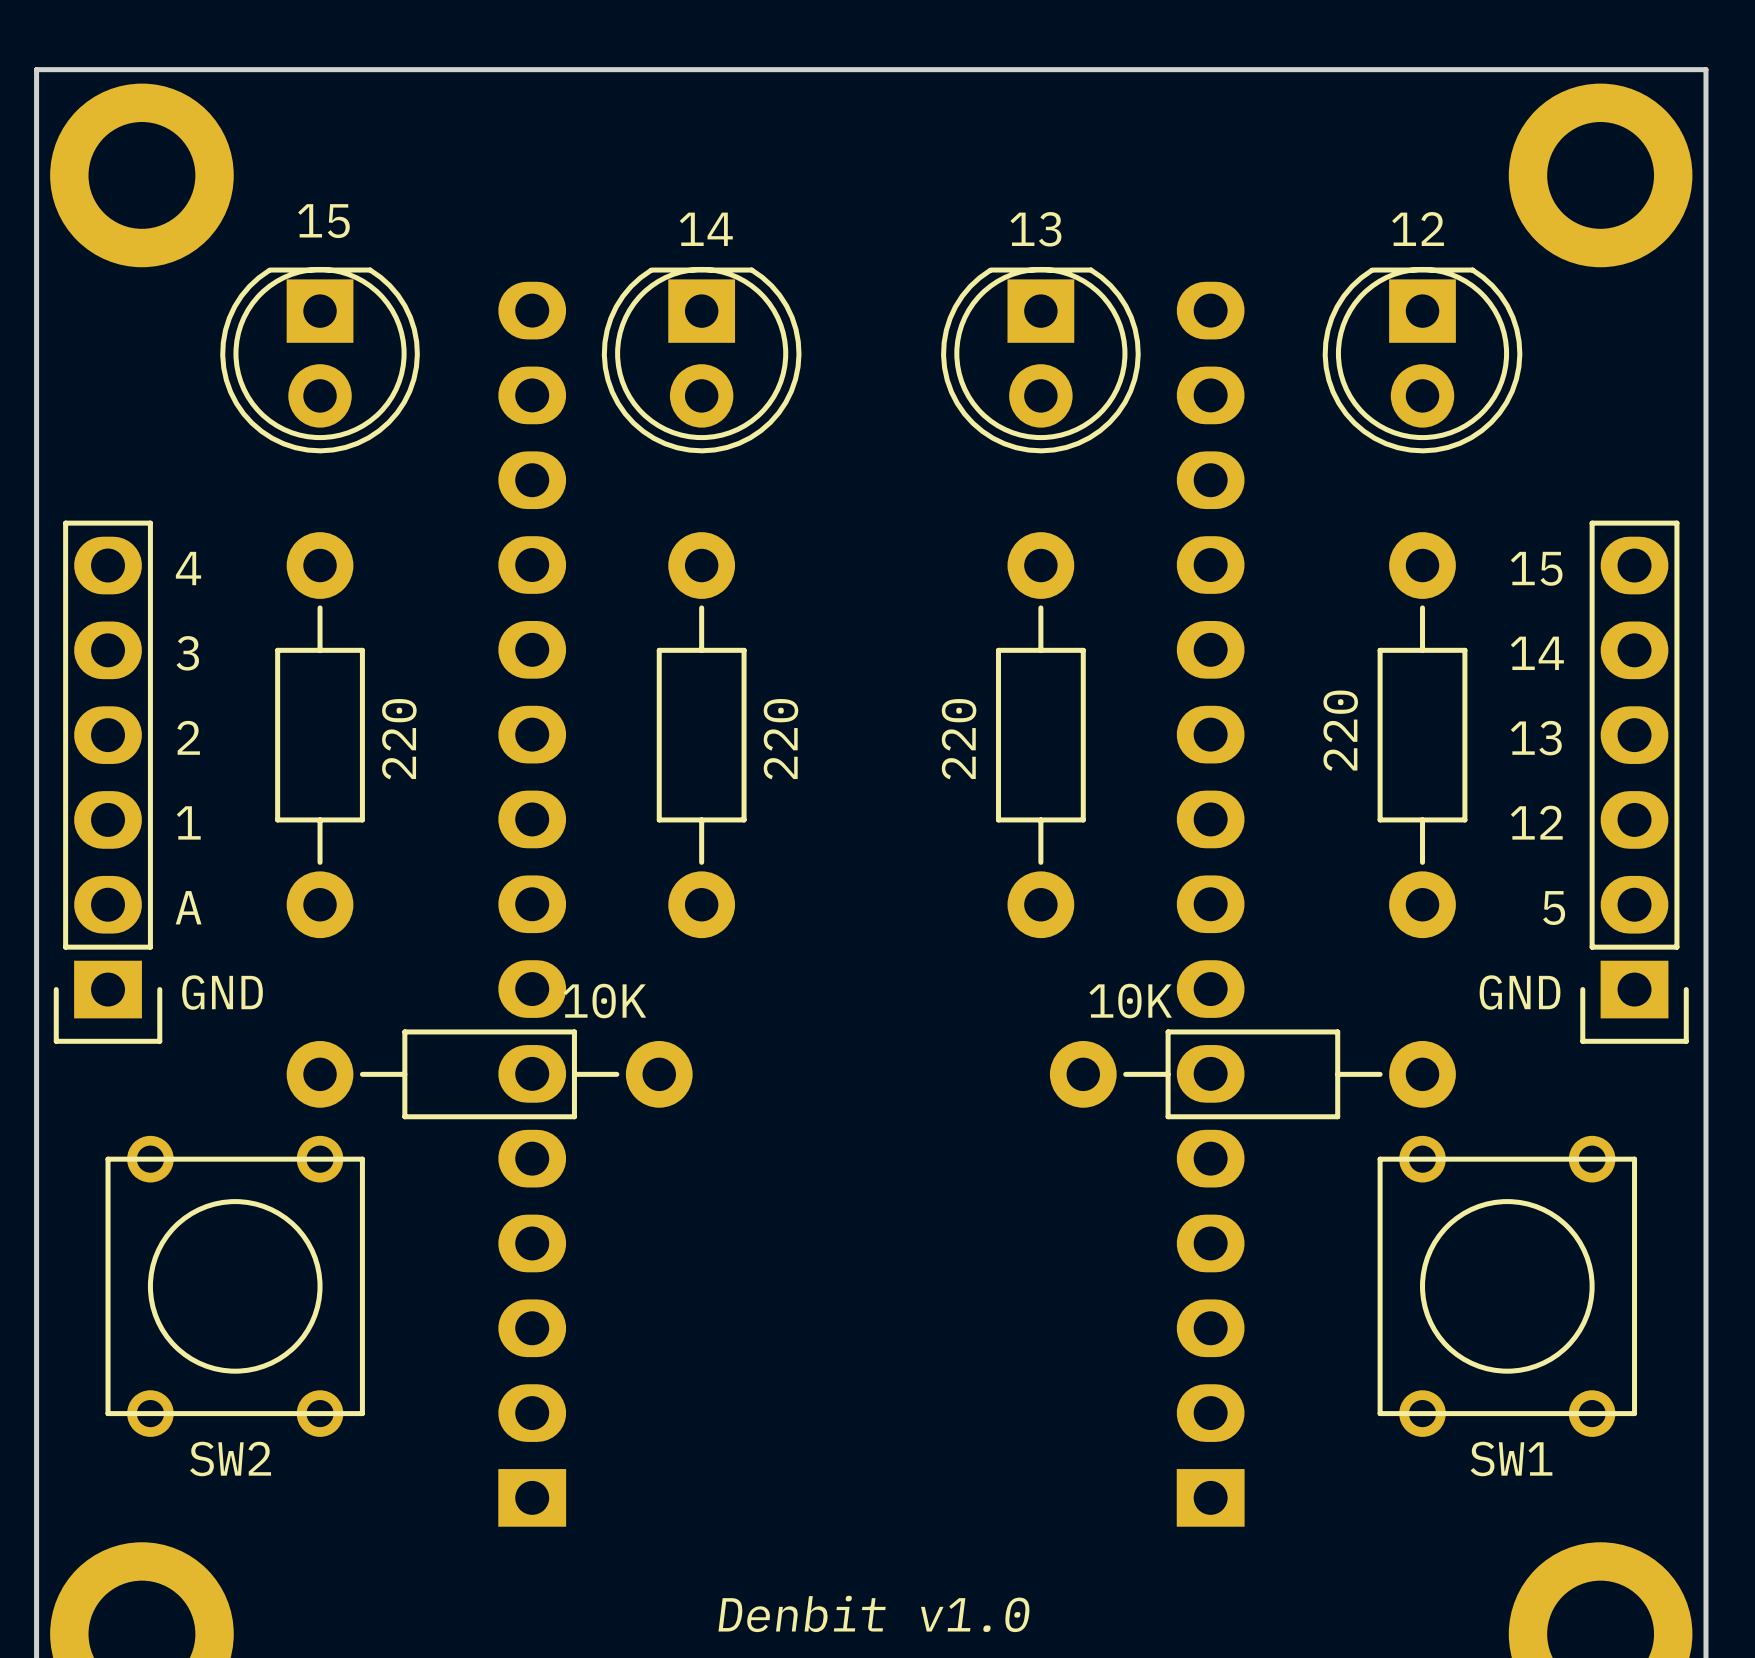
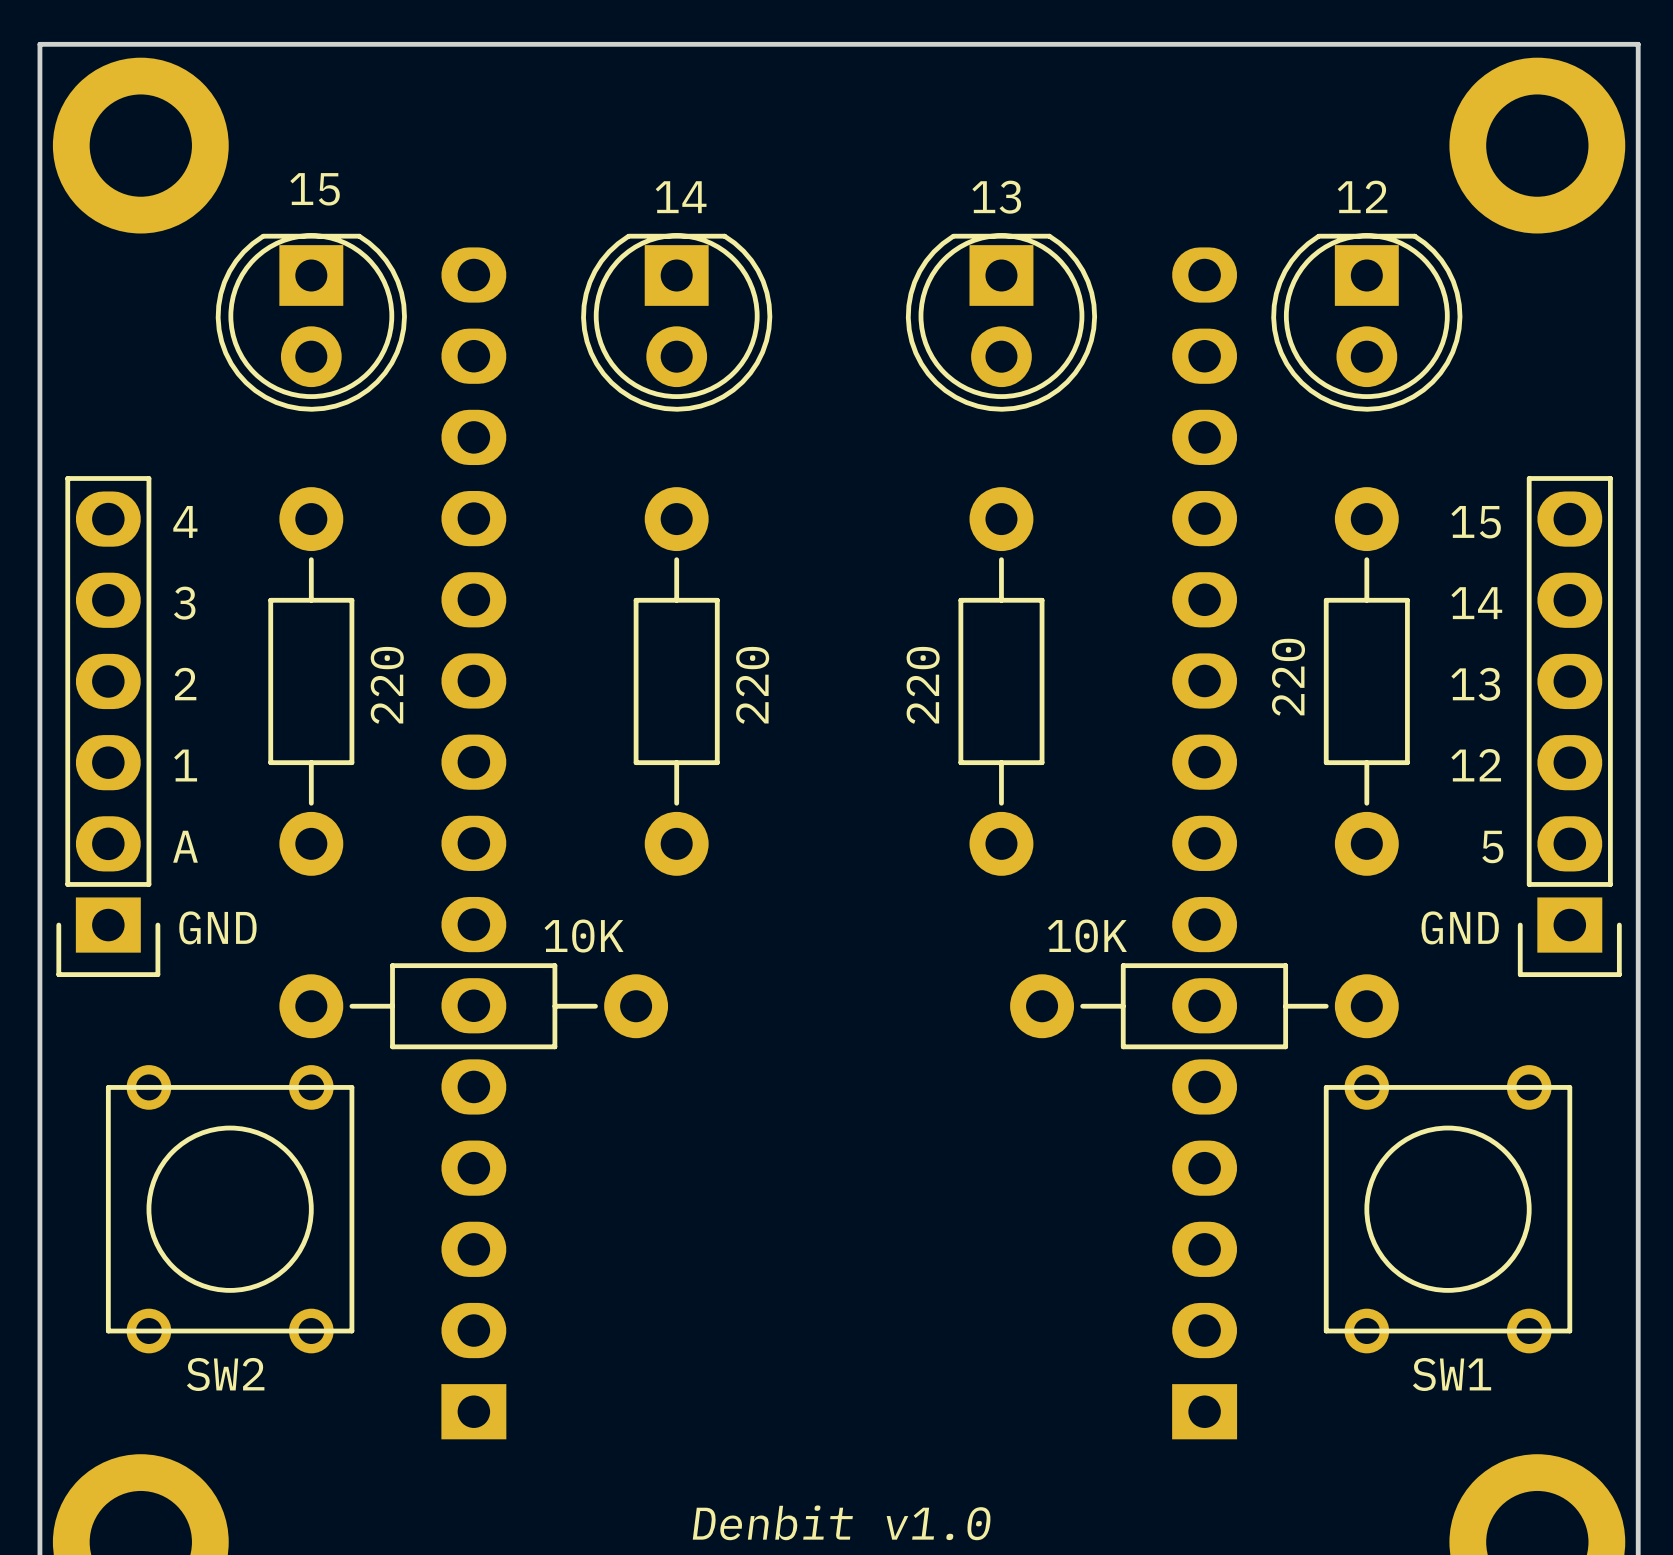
part position: (532, 904) -> (473, 843)
part position: (1210, 904) -> (1204, 843)

